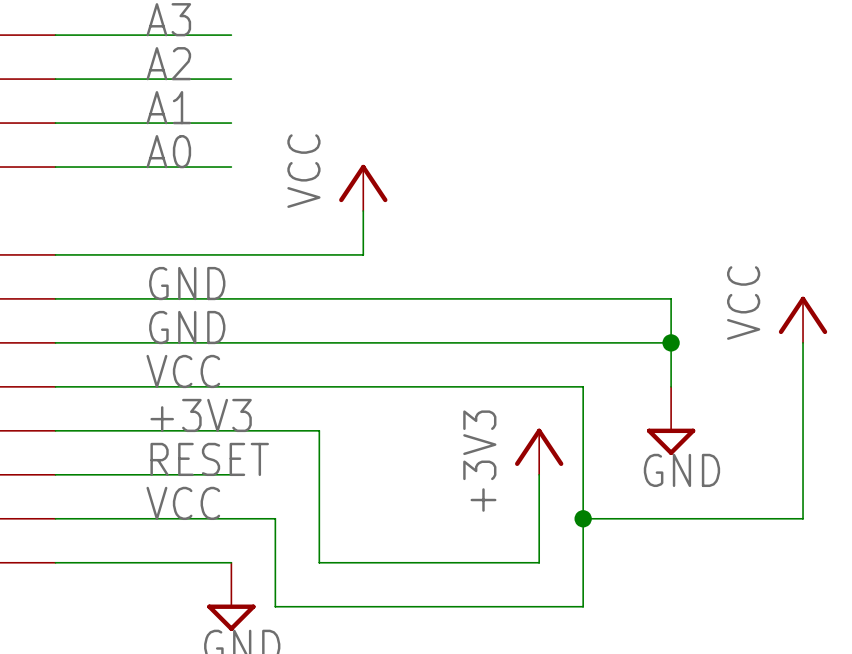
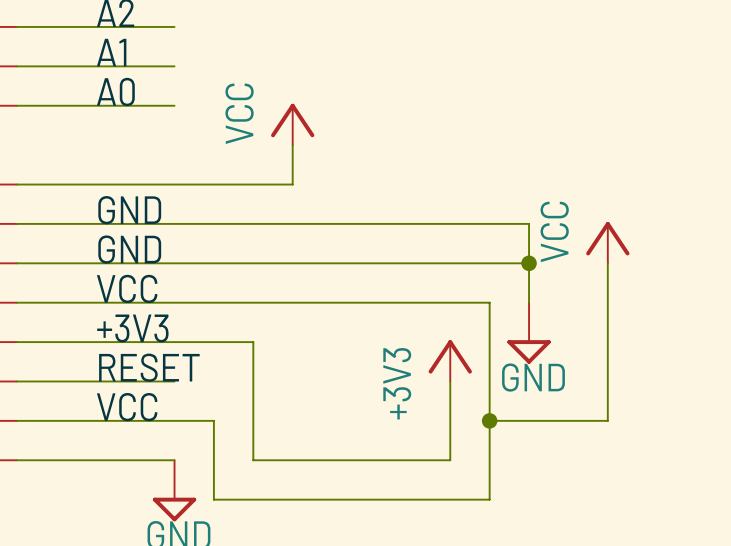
wire: (627, 298) (671, 298) (671, 386) -> (529, 223) (529, 302)
power symbol position: VCC (803, 319) -> VCC (607, 242)
wire: (627, 342) (671, 342) -> none
junction position: (671, 342) -> (529, 263)
wire: (803, 342) (803, 518) (715, 518) -> (607, 263) (607, 420)
power symbol position: GND (671, 420) -> GND (529, 333)

